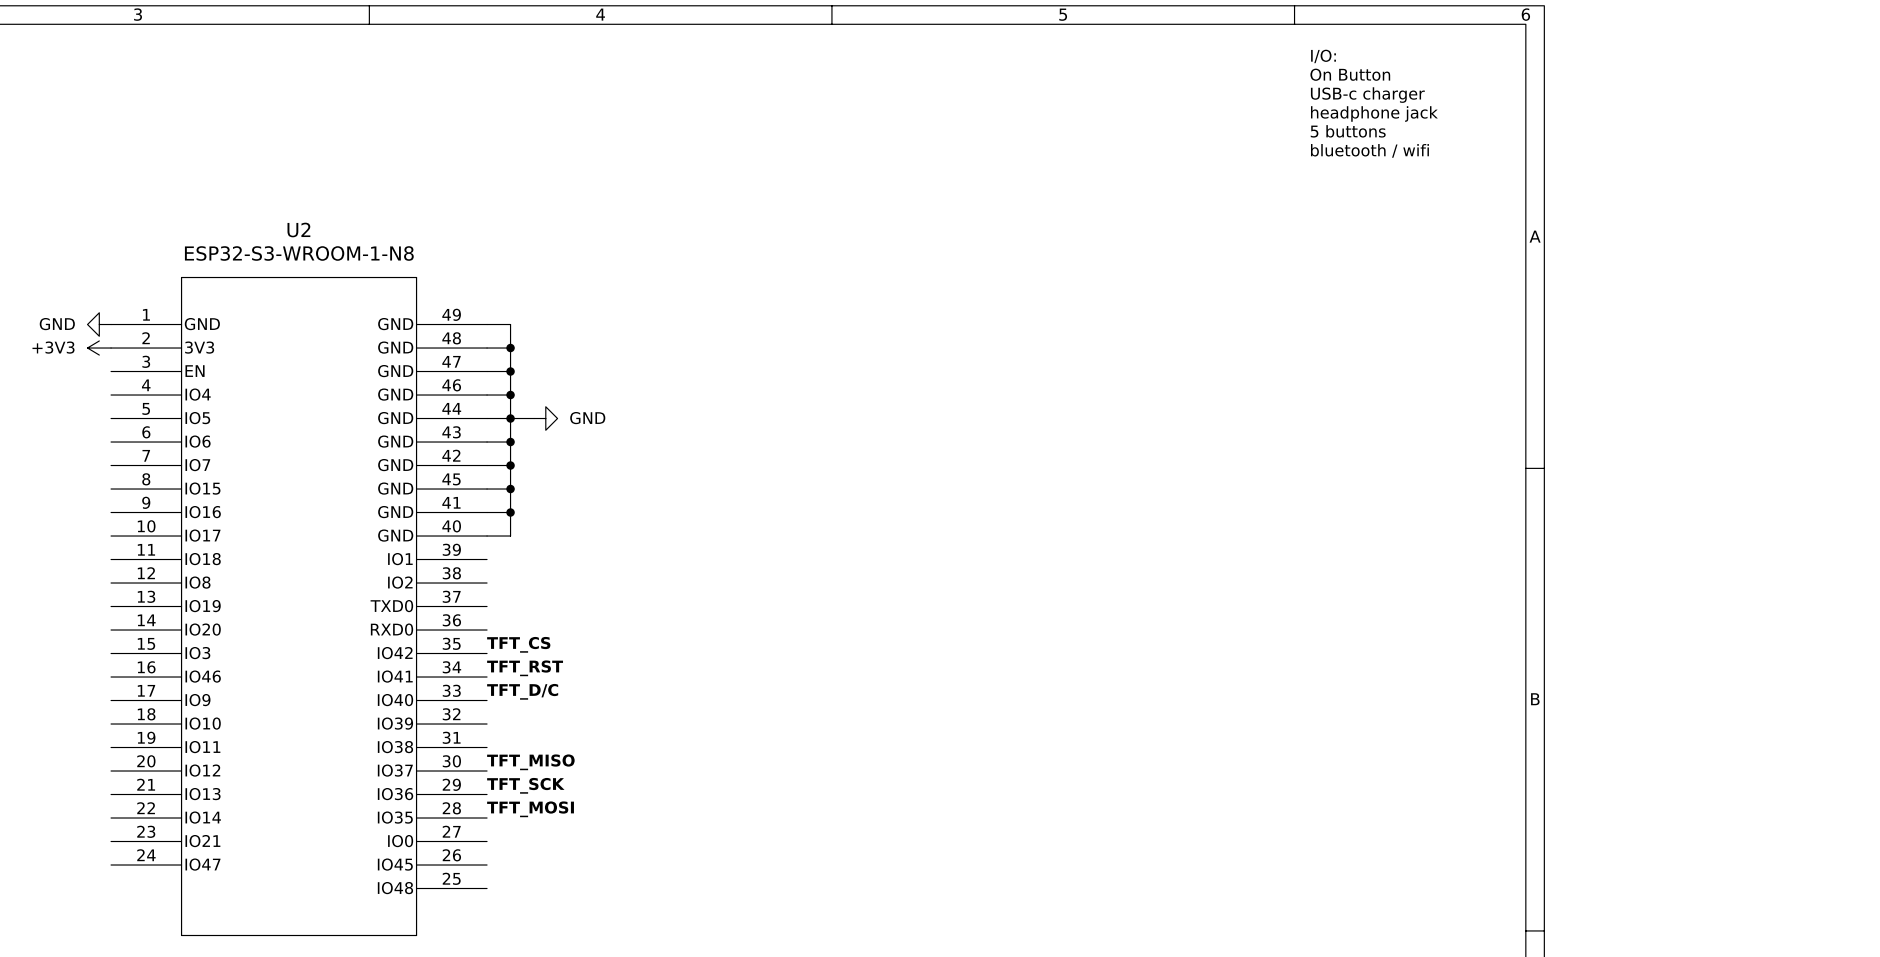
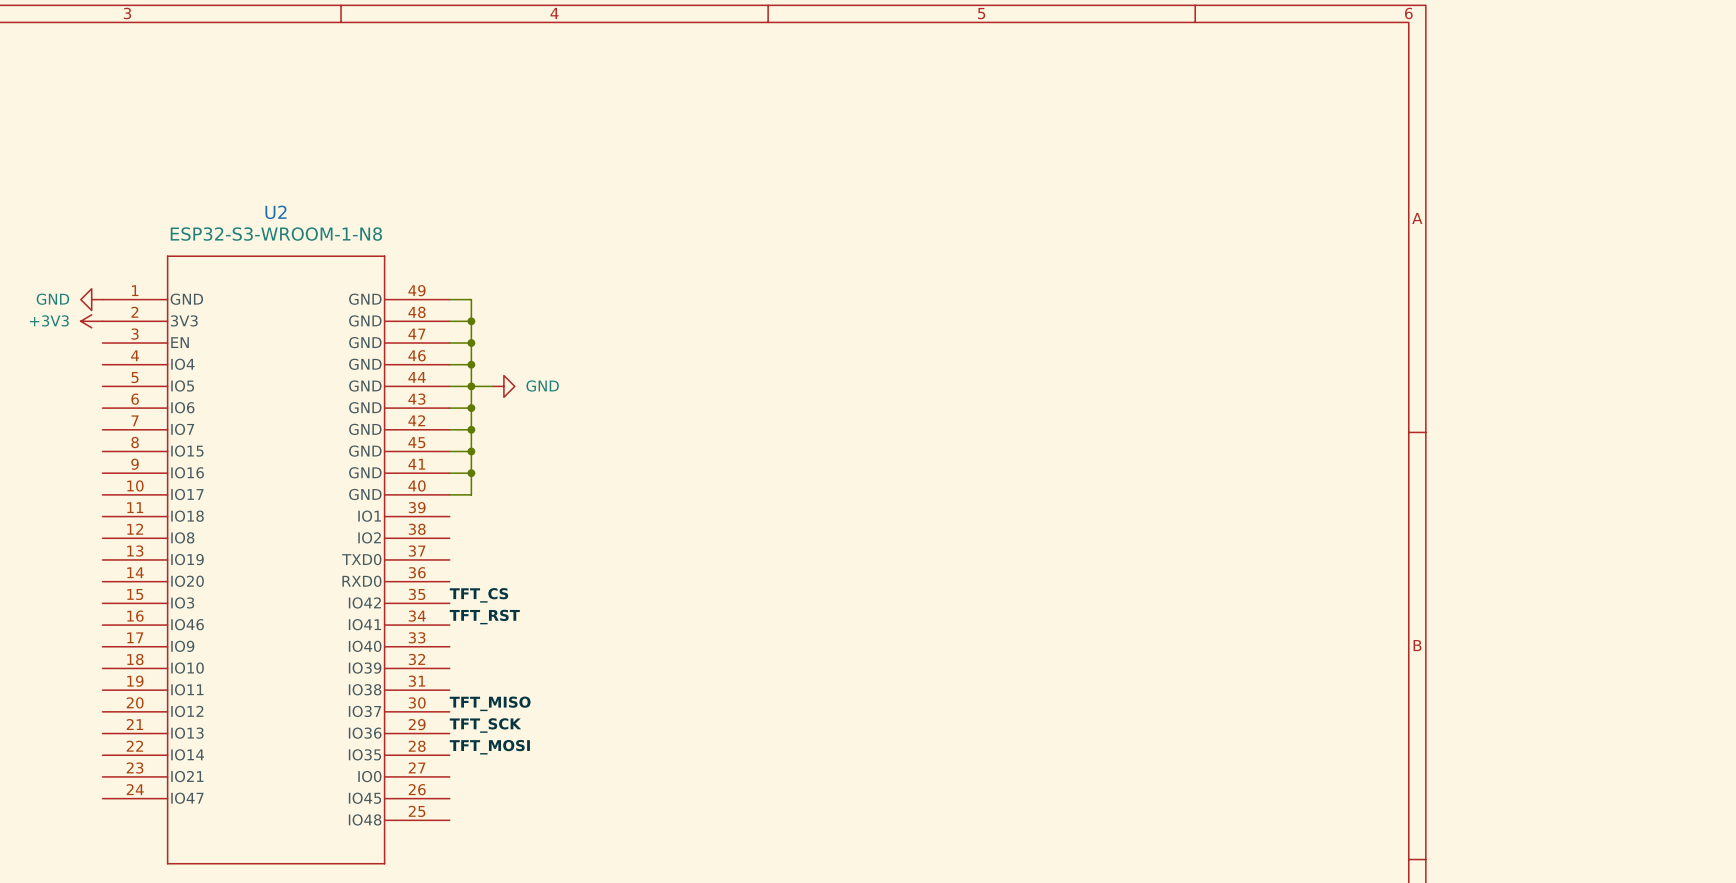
text: I/O: (1323, 56) -> none
text: On Button (1350, 74) -> none
text: USB-c charger (1367, 95) -> none
text: headphone jack (1374, 113) -> none
text: 5 buttons (1348, 131) -> none
text: bluetooth / wifi (1369, 150) -> none
label: TFT_D/C (522, 691) -> none

